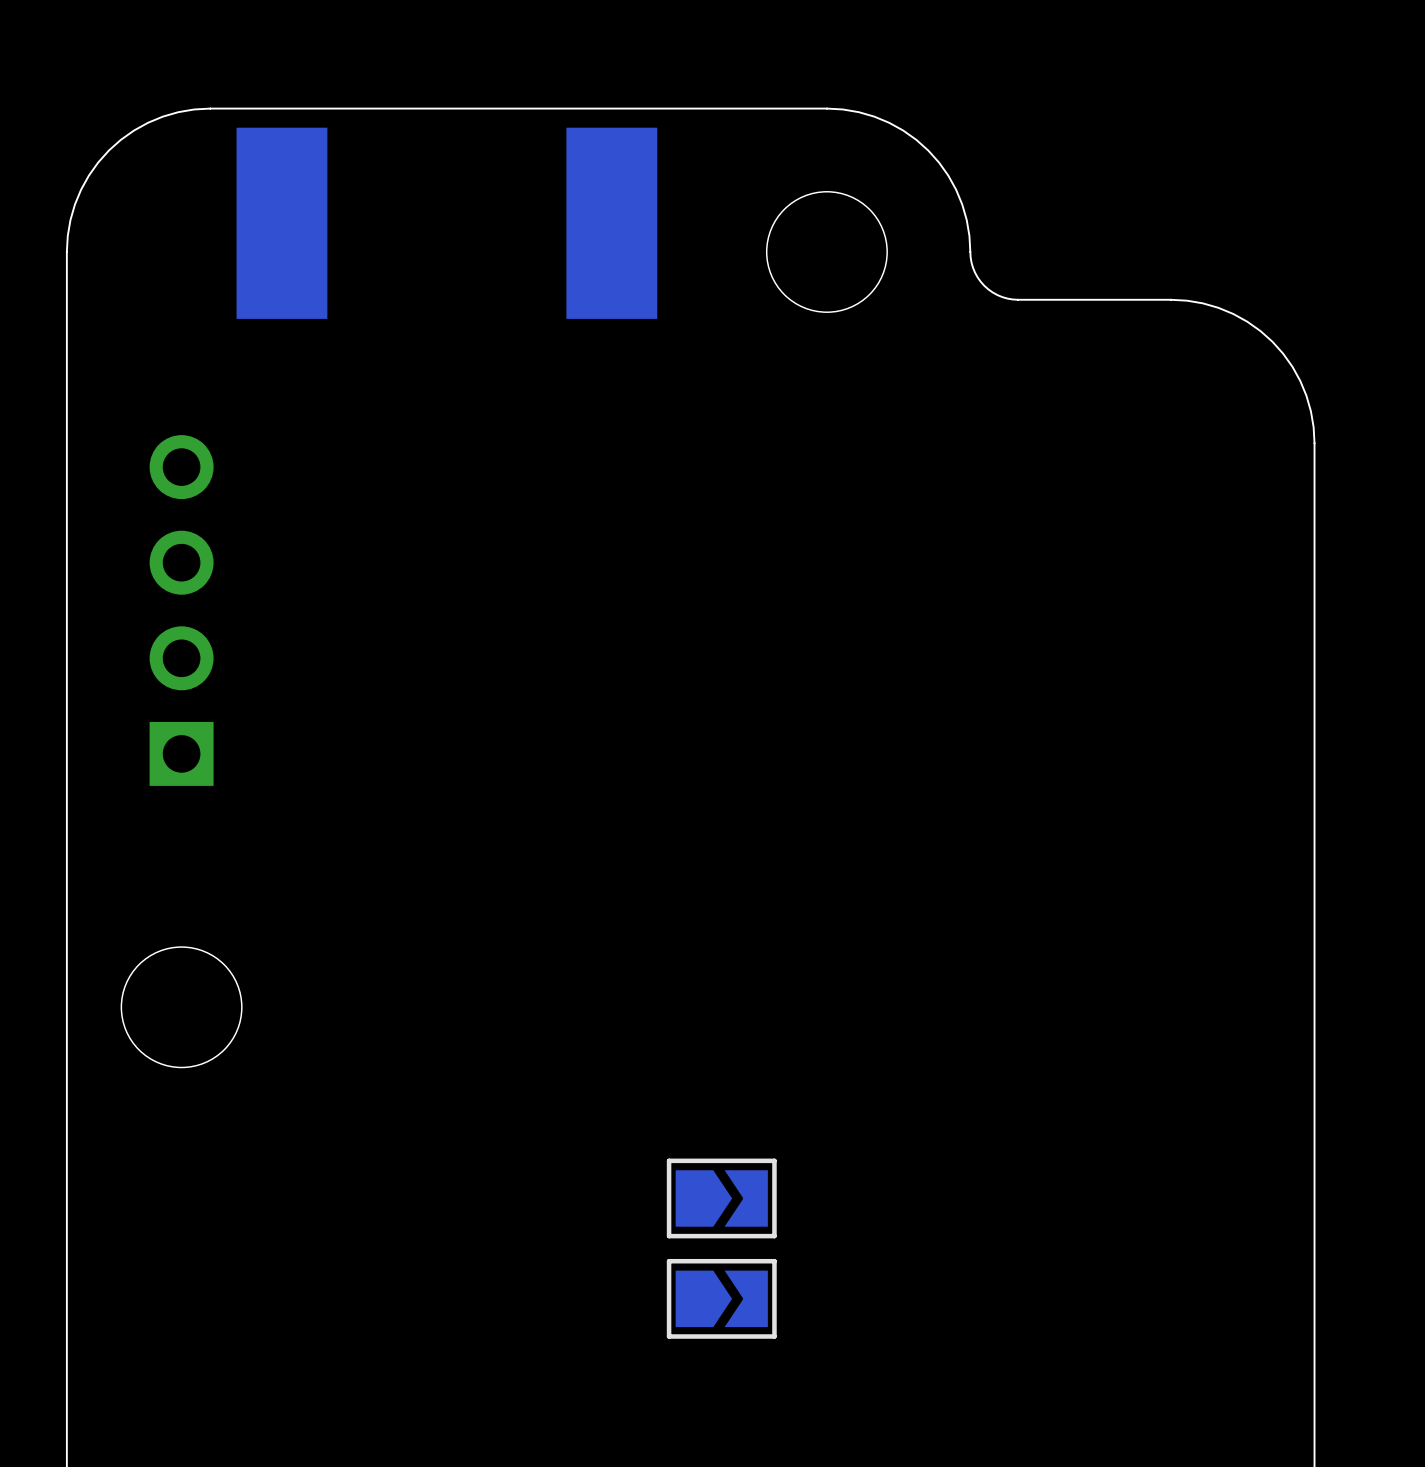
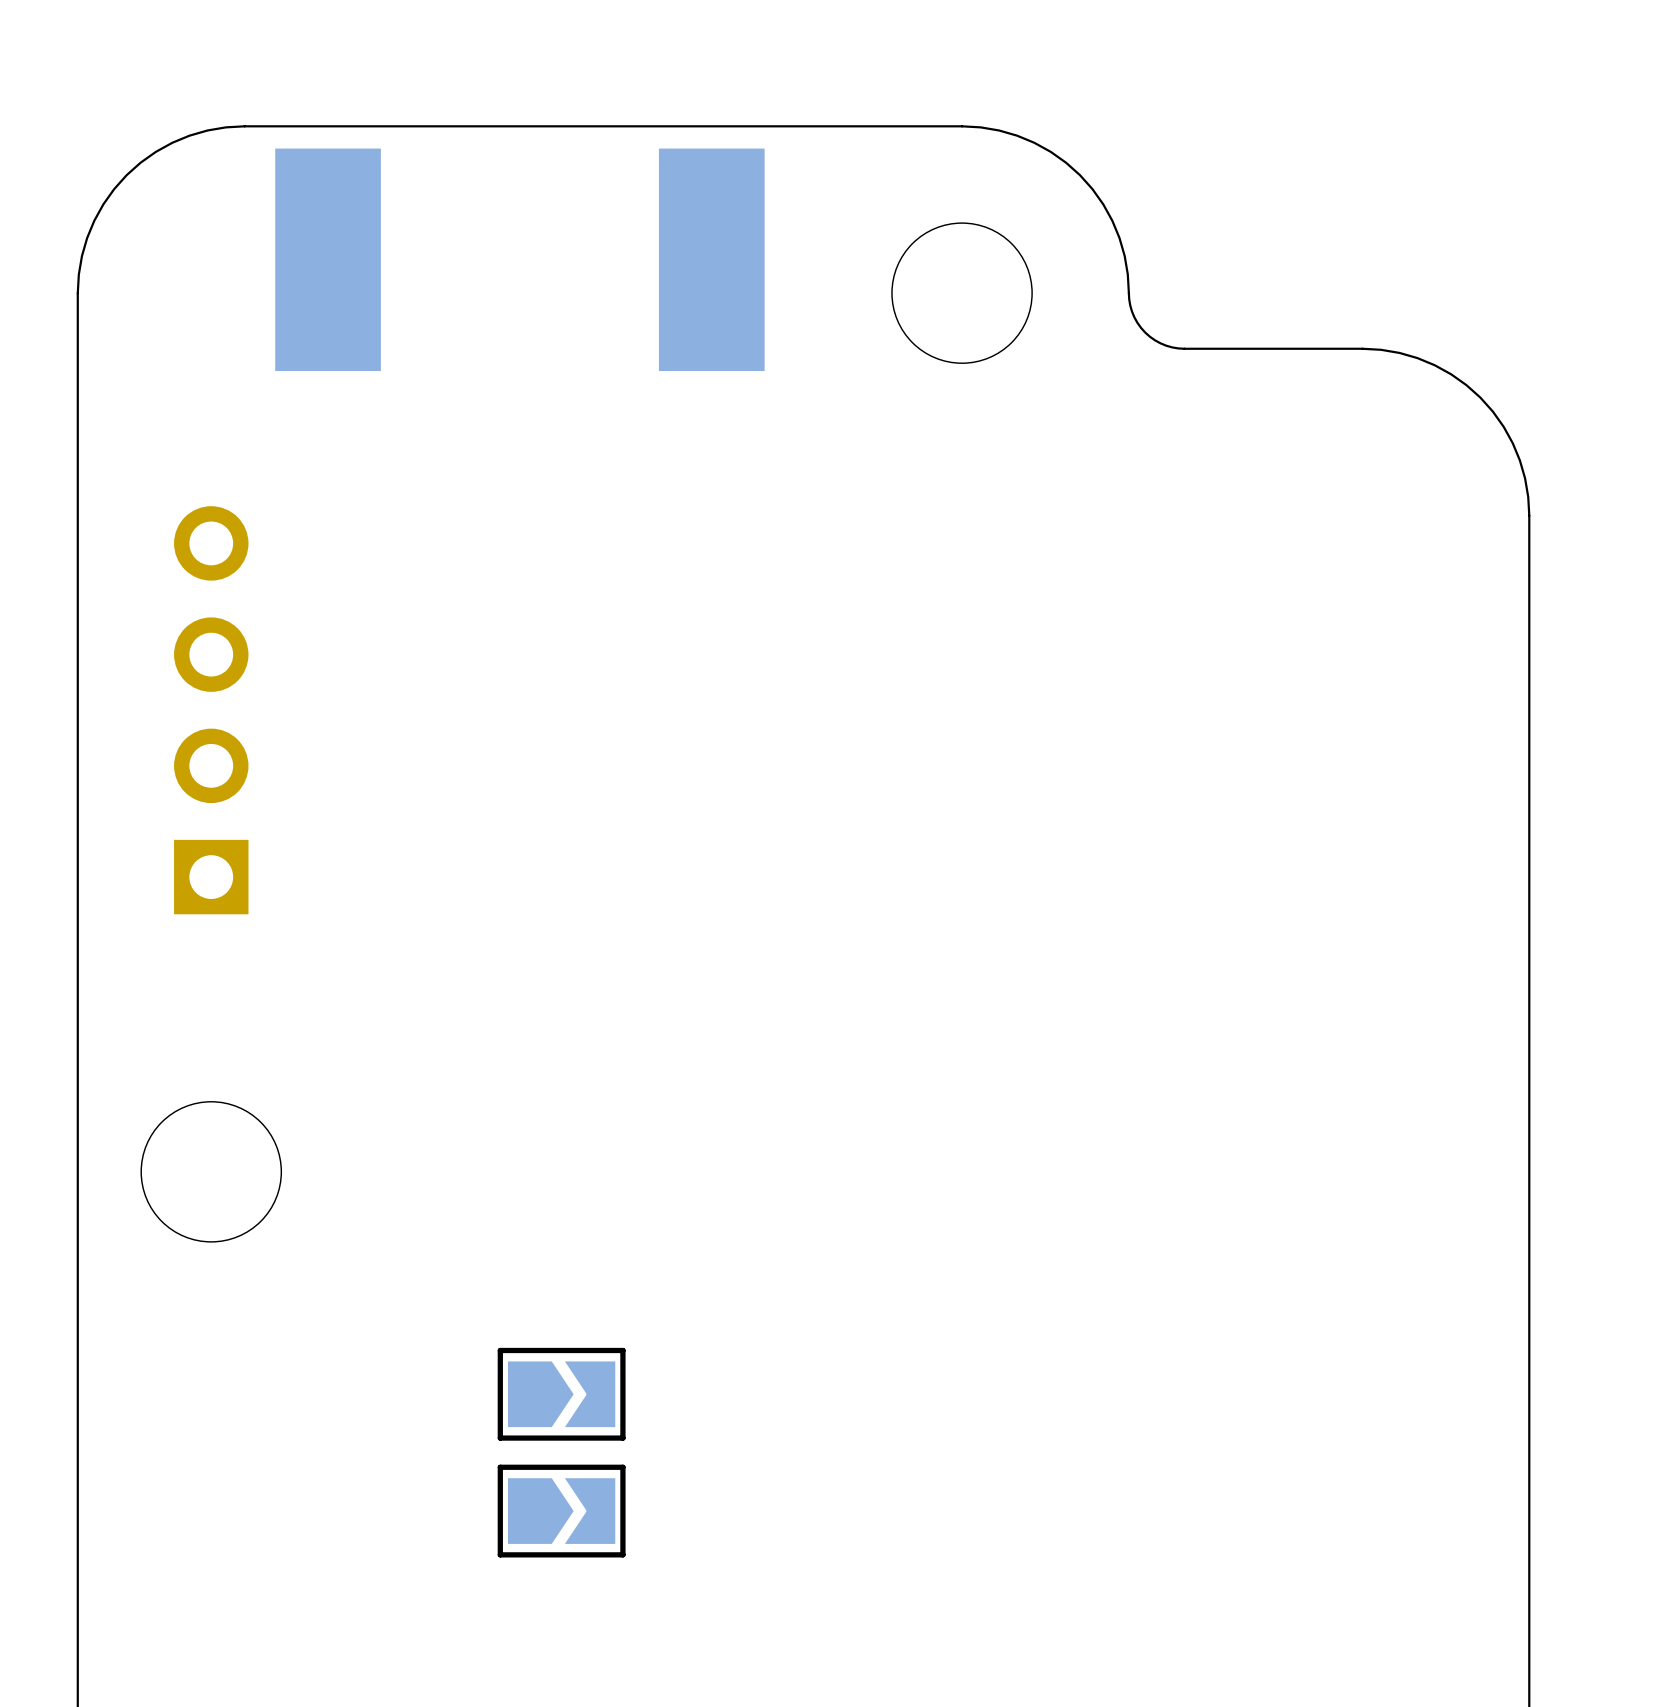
part: none -> (561, 1394)
part: (721, 1198) -> none
part: none -> (561, 1511)
part: (721, 1298) -> none

